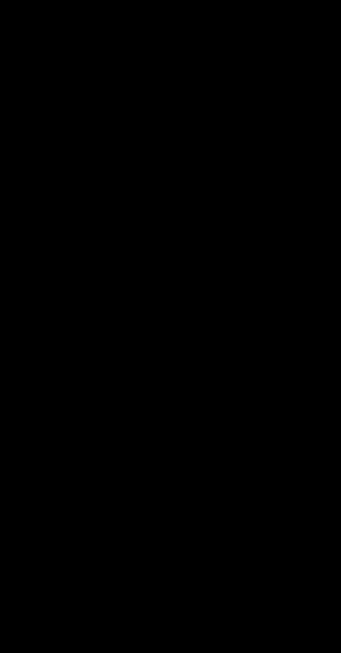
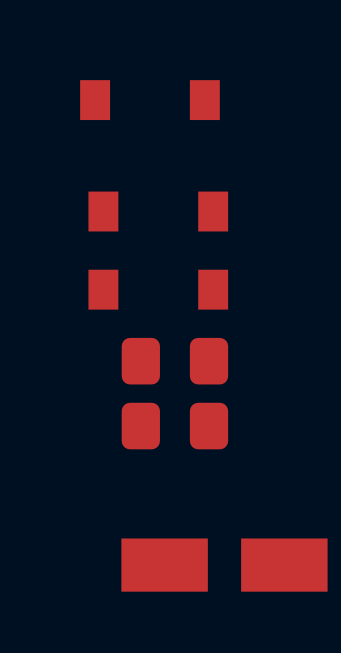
part: none -> (149, 100)
part: none -> (158, 211)
part: none -> (158, 289)
part: none -> (174, 361)
part: none -> (174, 426)
part: none -> (224, 565)

